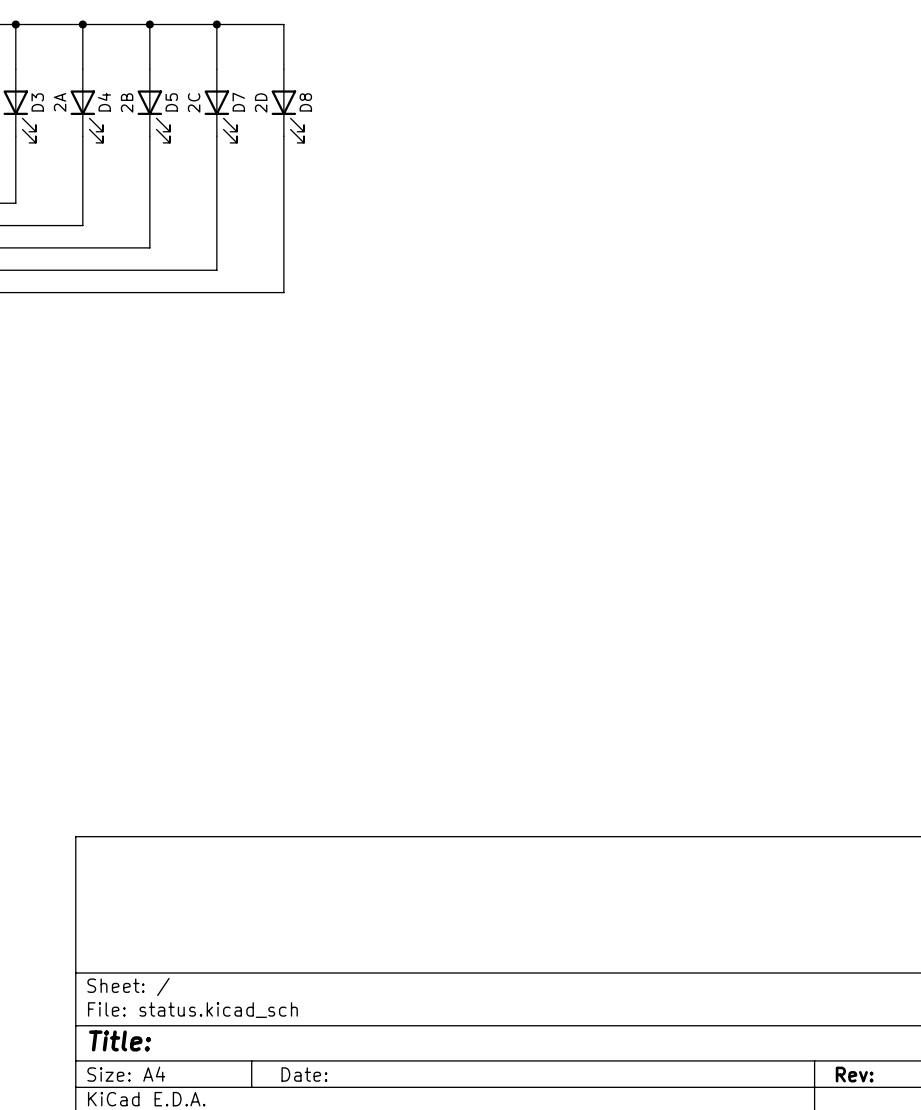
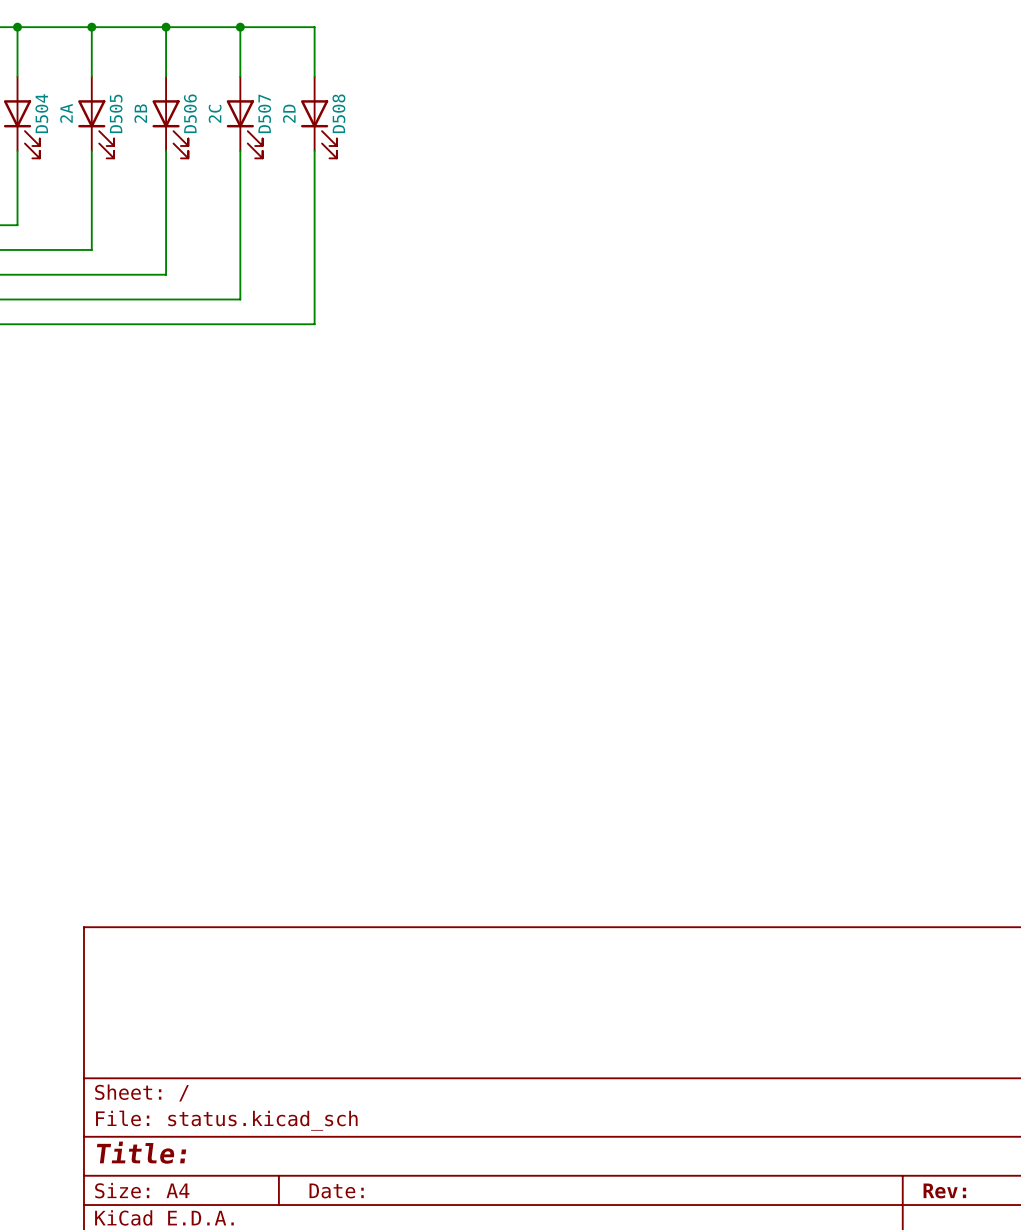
D3 name: D3 (37, 102) -> D504 (41, 113)
D4 name: D4 (104, 102) -> D505 (116, 113)
D5 name: D5 (171, 102) -> D506 (190, 113)
D7 name: D7 (238, 102) -> D507 (264, 113)
D8 name: D8 (305, 102) -> D508 (338, 113)

